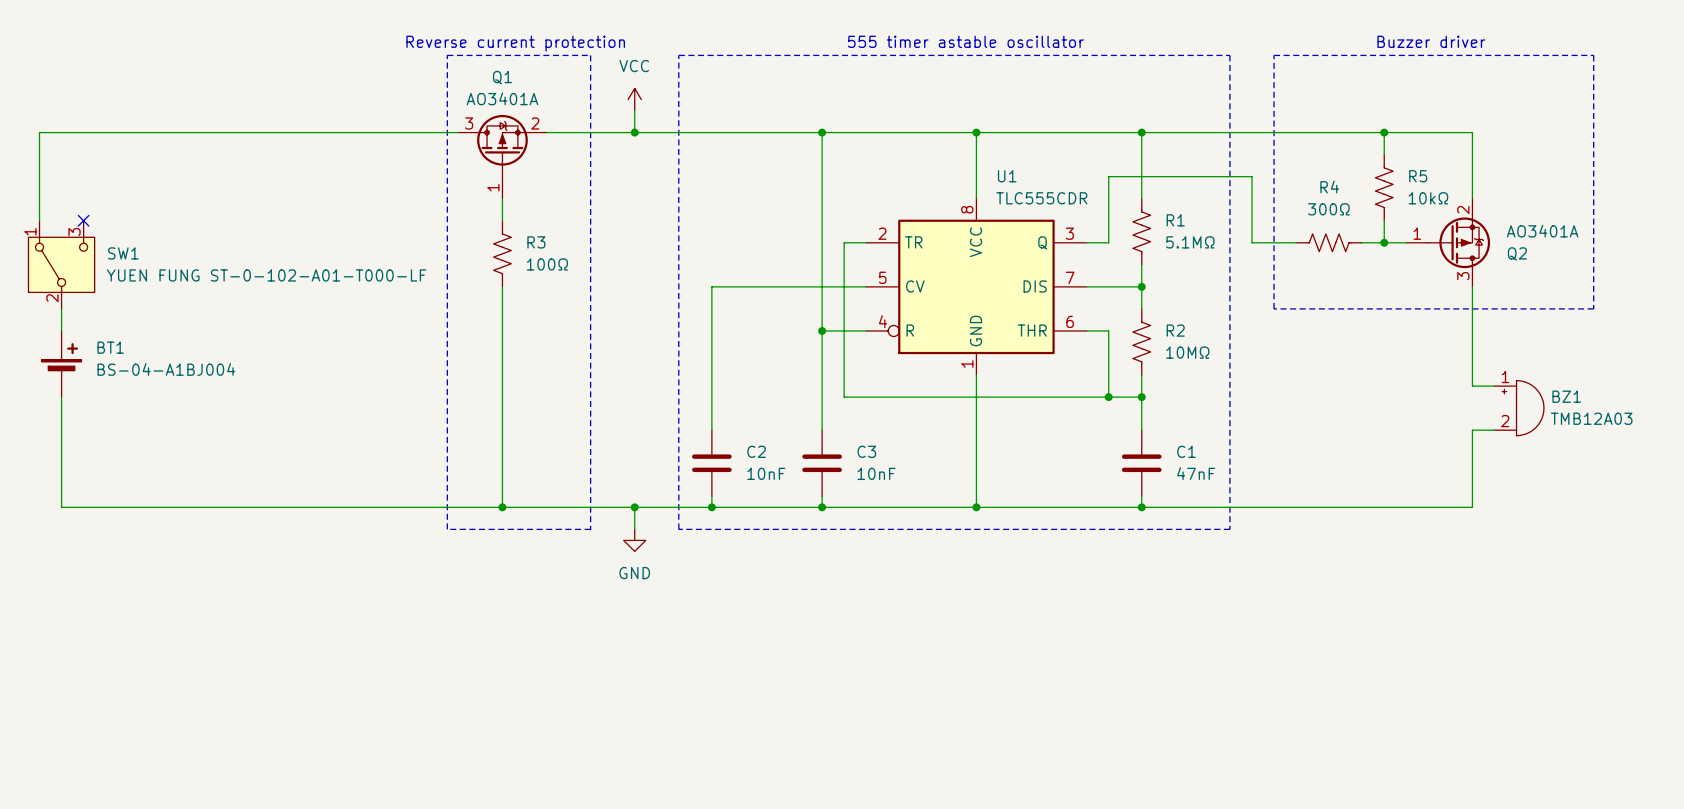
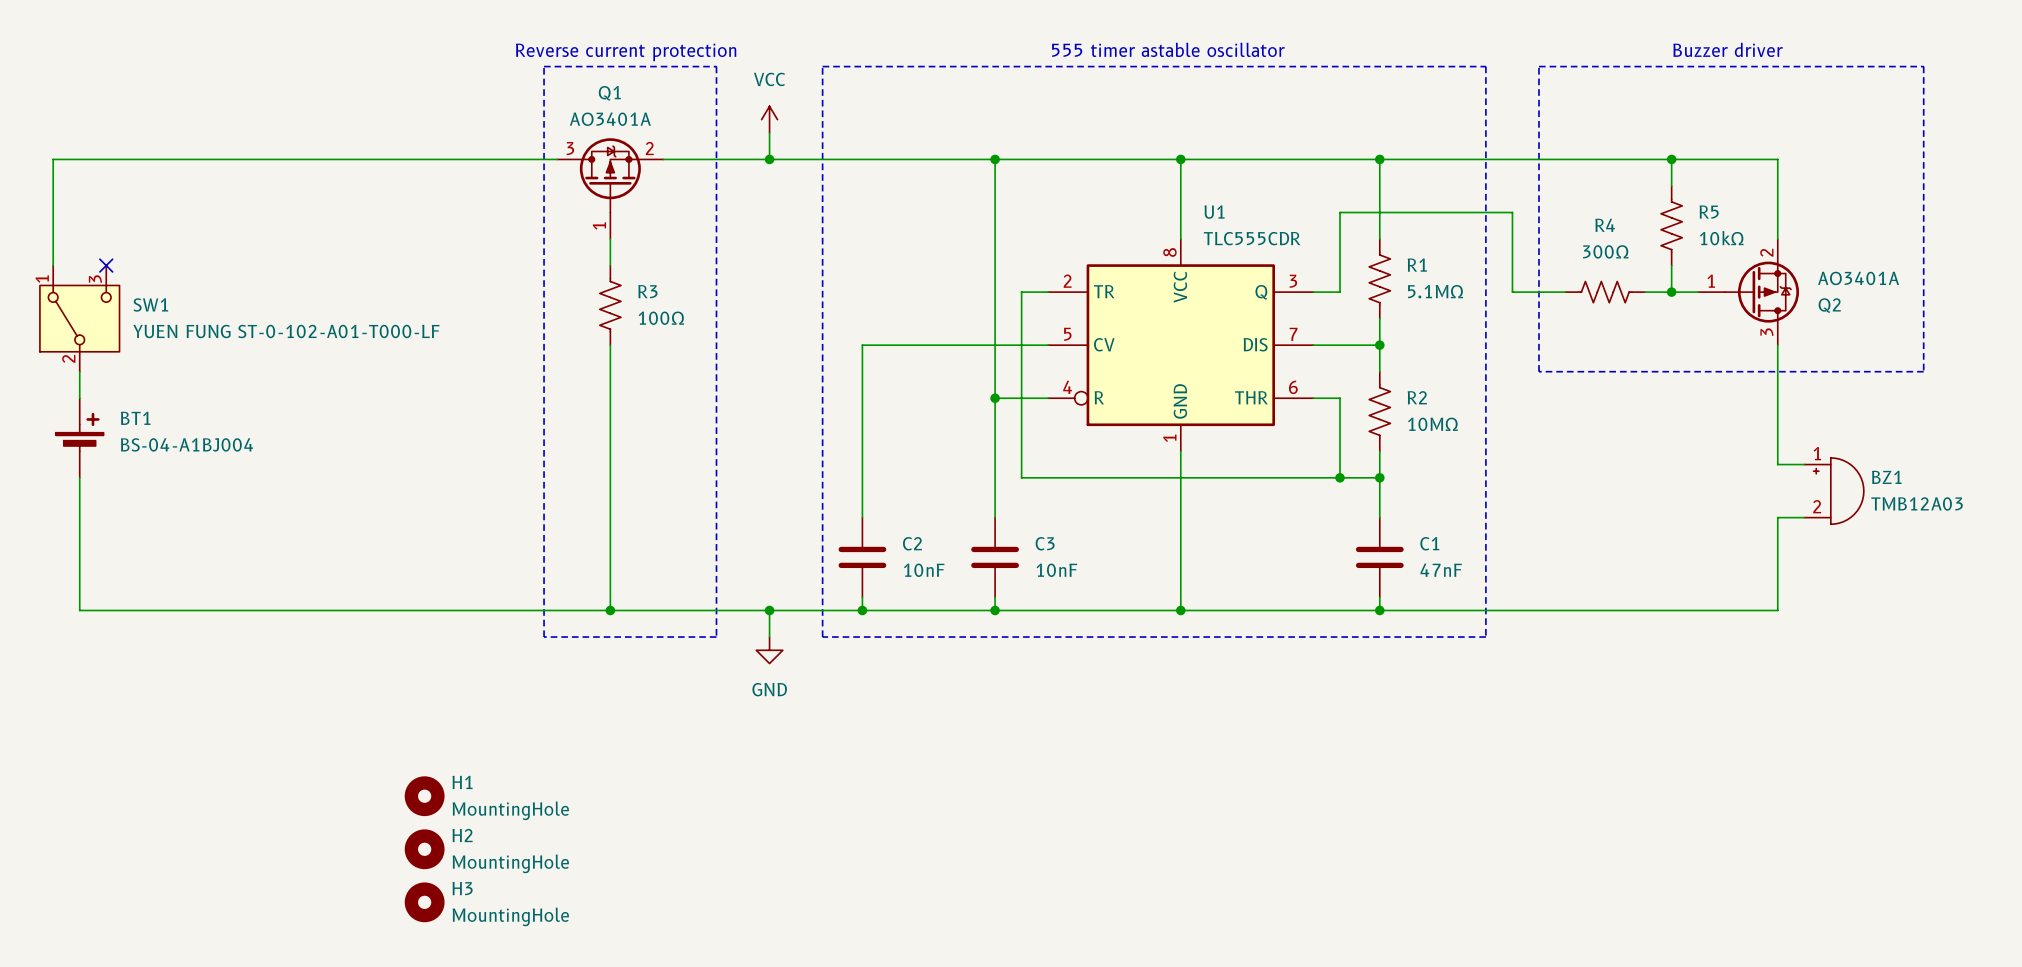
H1: none -> MountingHole (424, 796)
H2: none -> MountingHole (424, 849)
H3: none -> MountingHole (424, 902)

